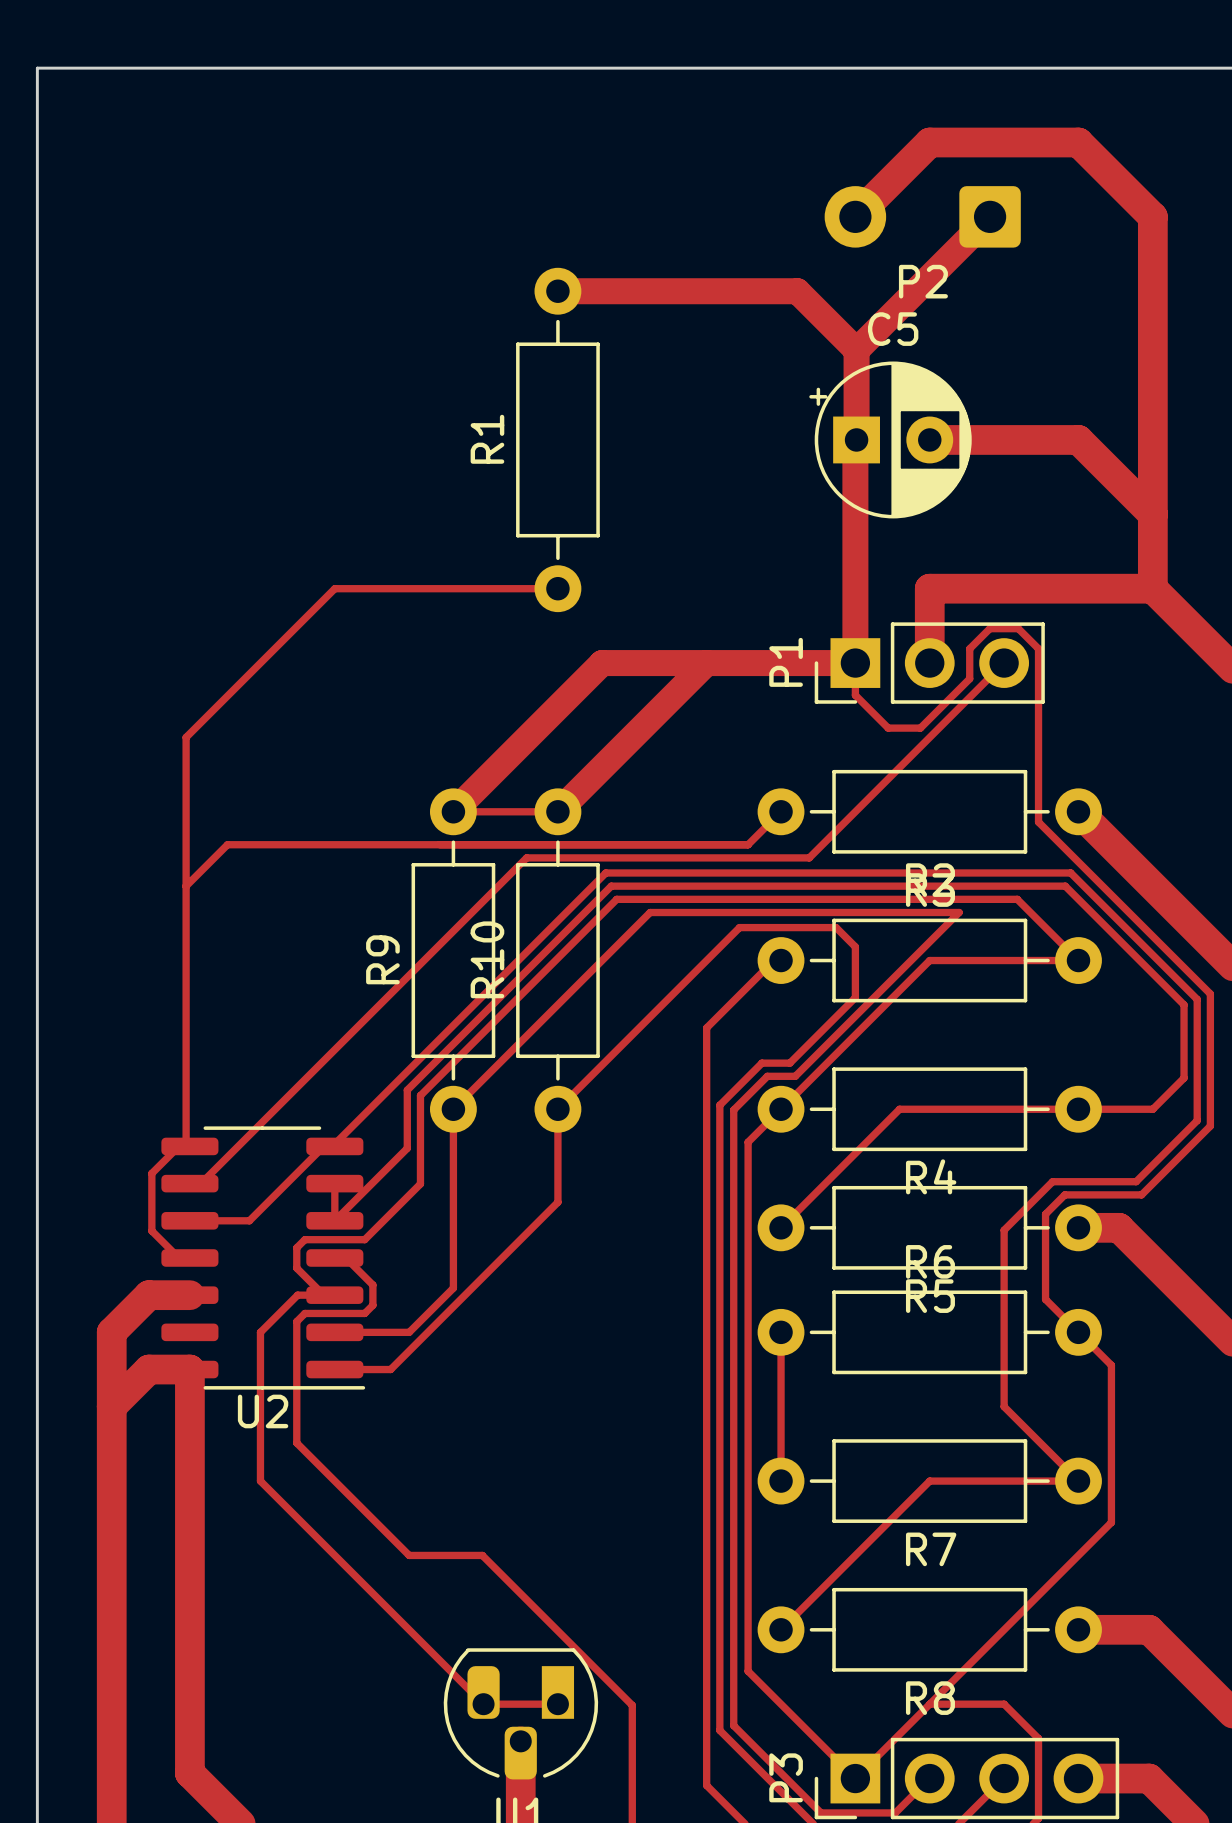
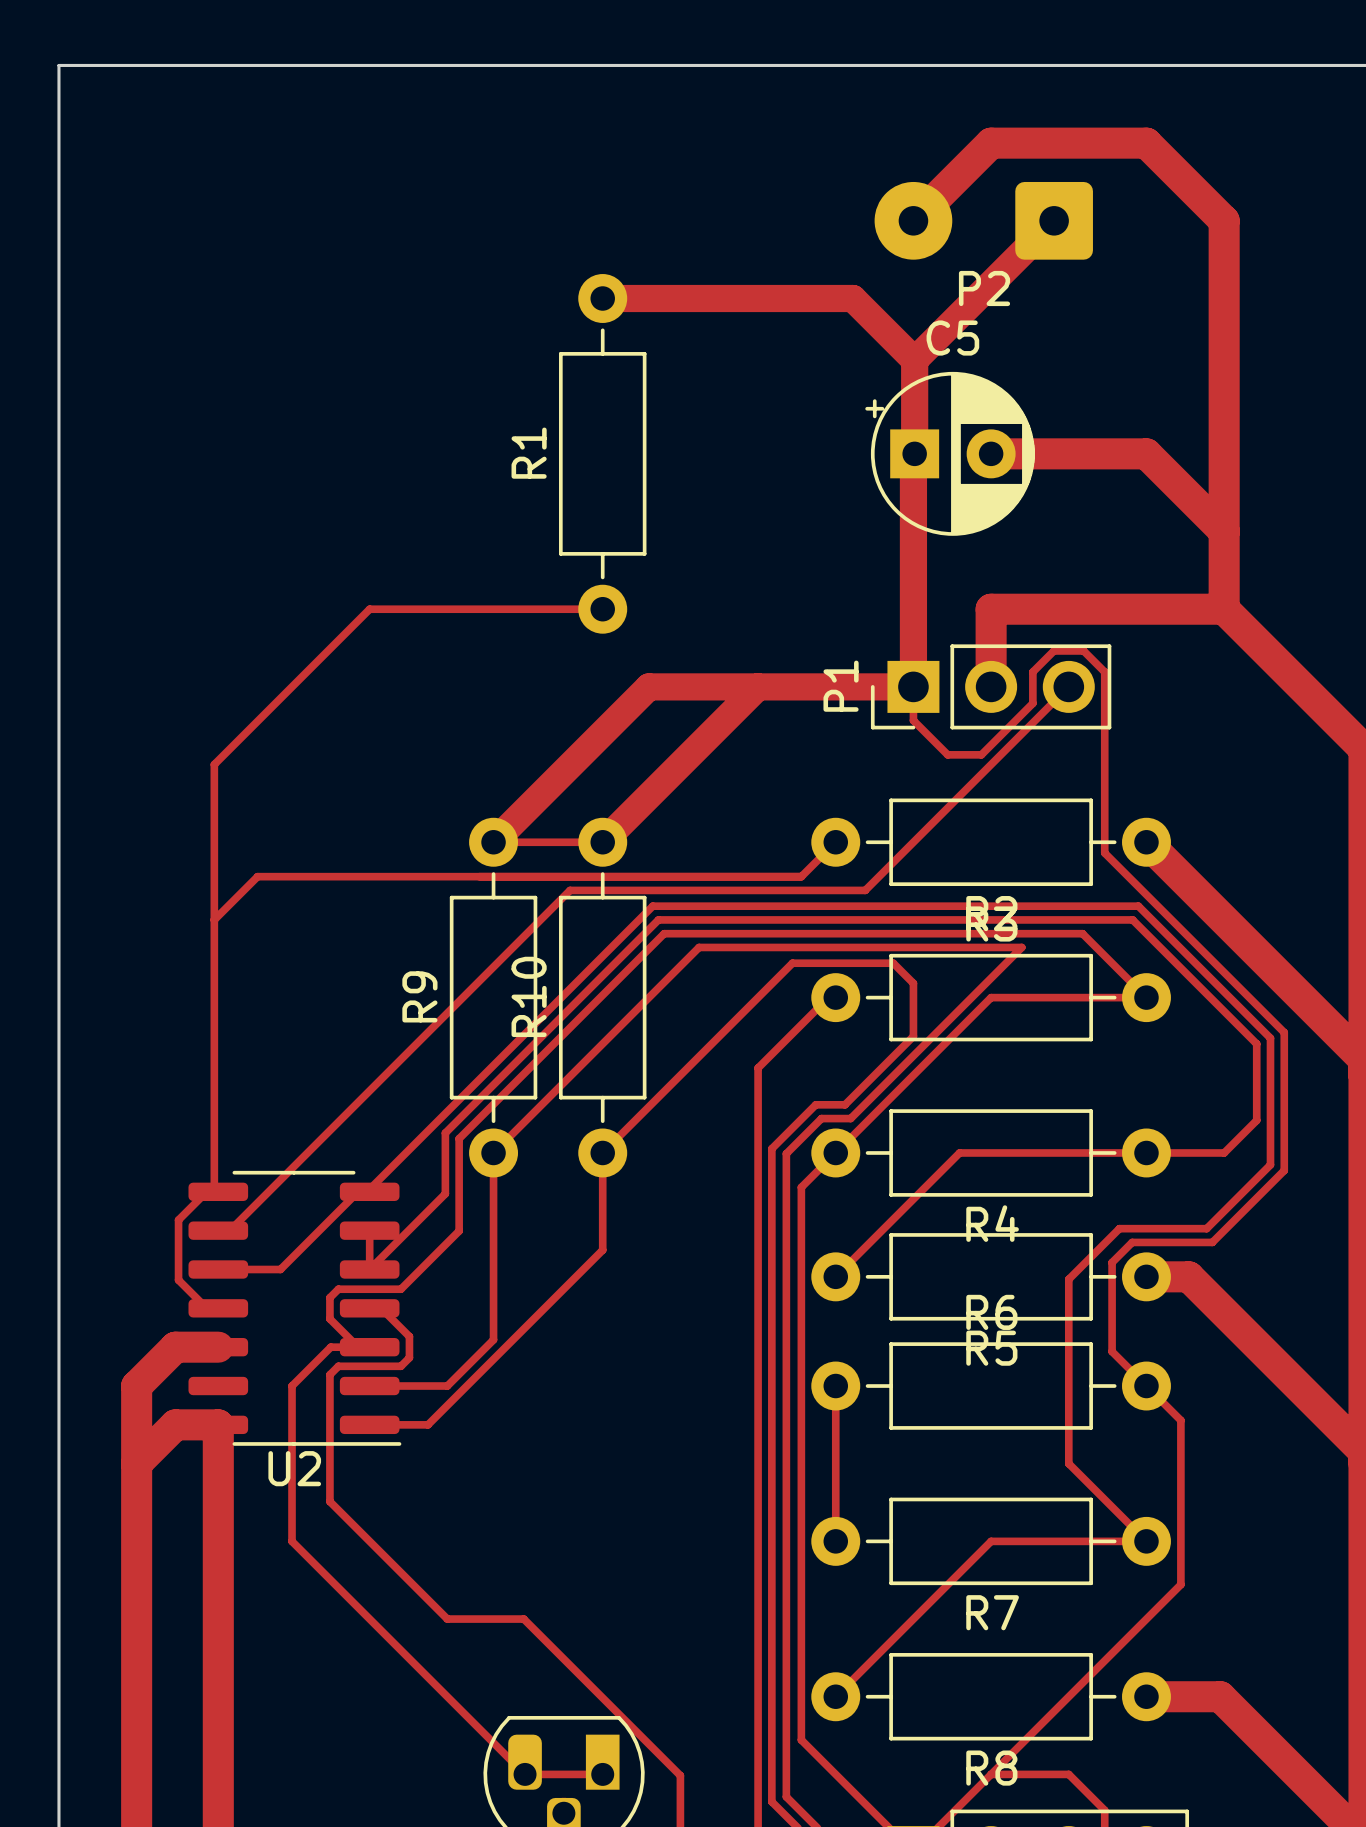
P2 footprint: [824, 186, 1021, 248] -> [874, 181, 1093, 260]

